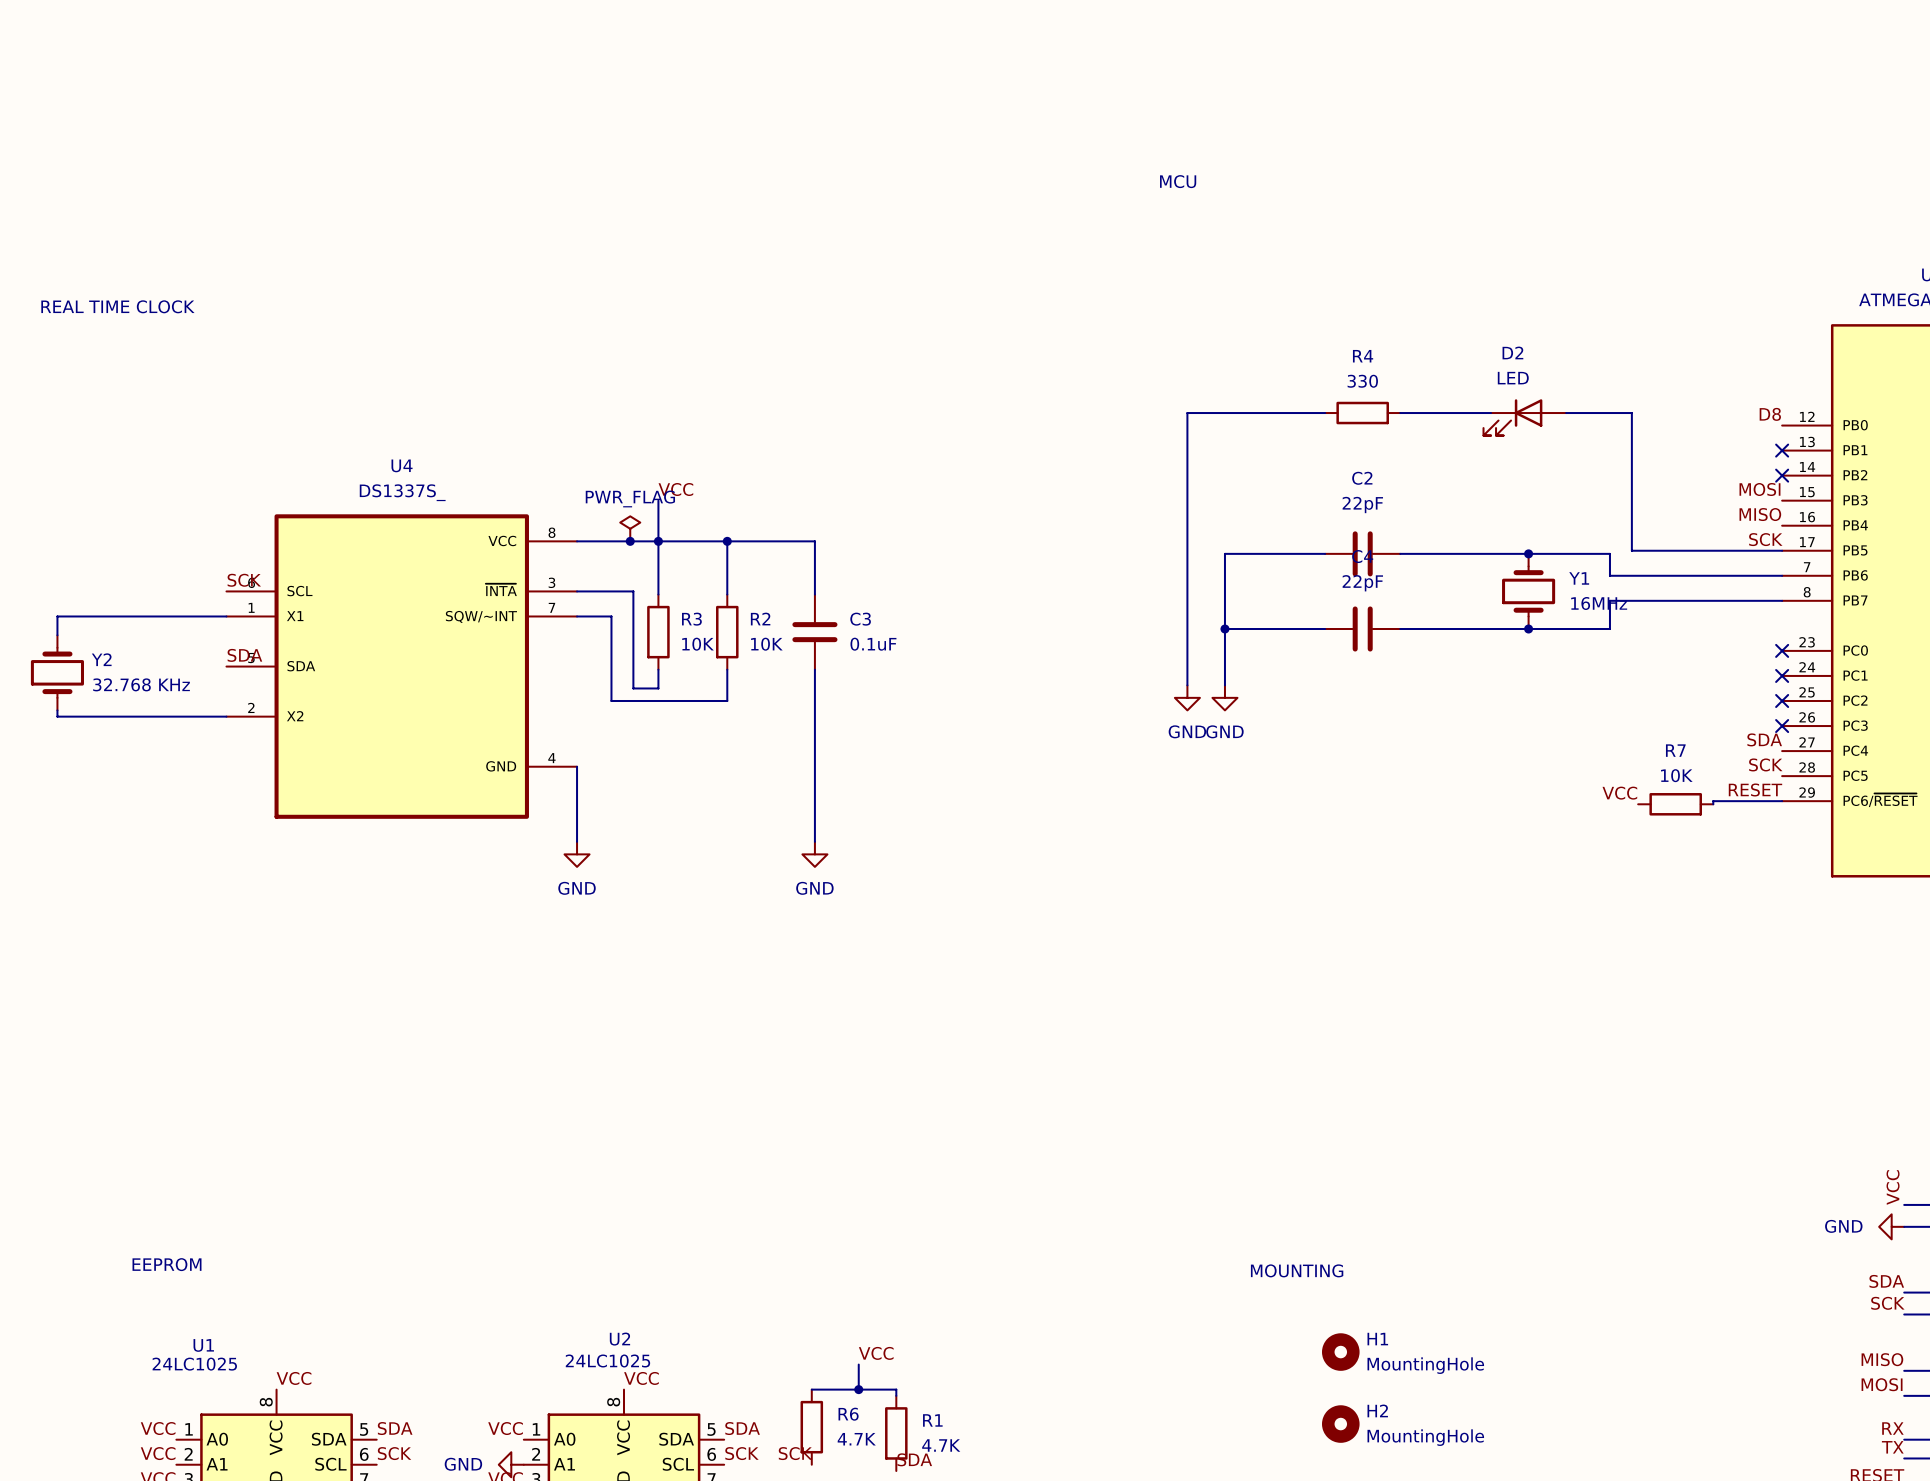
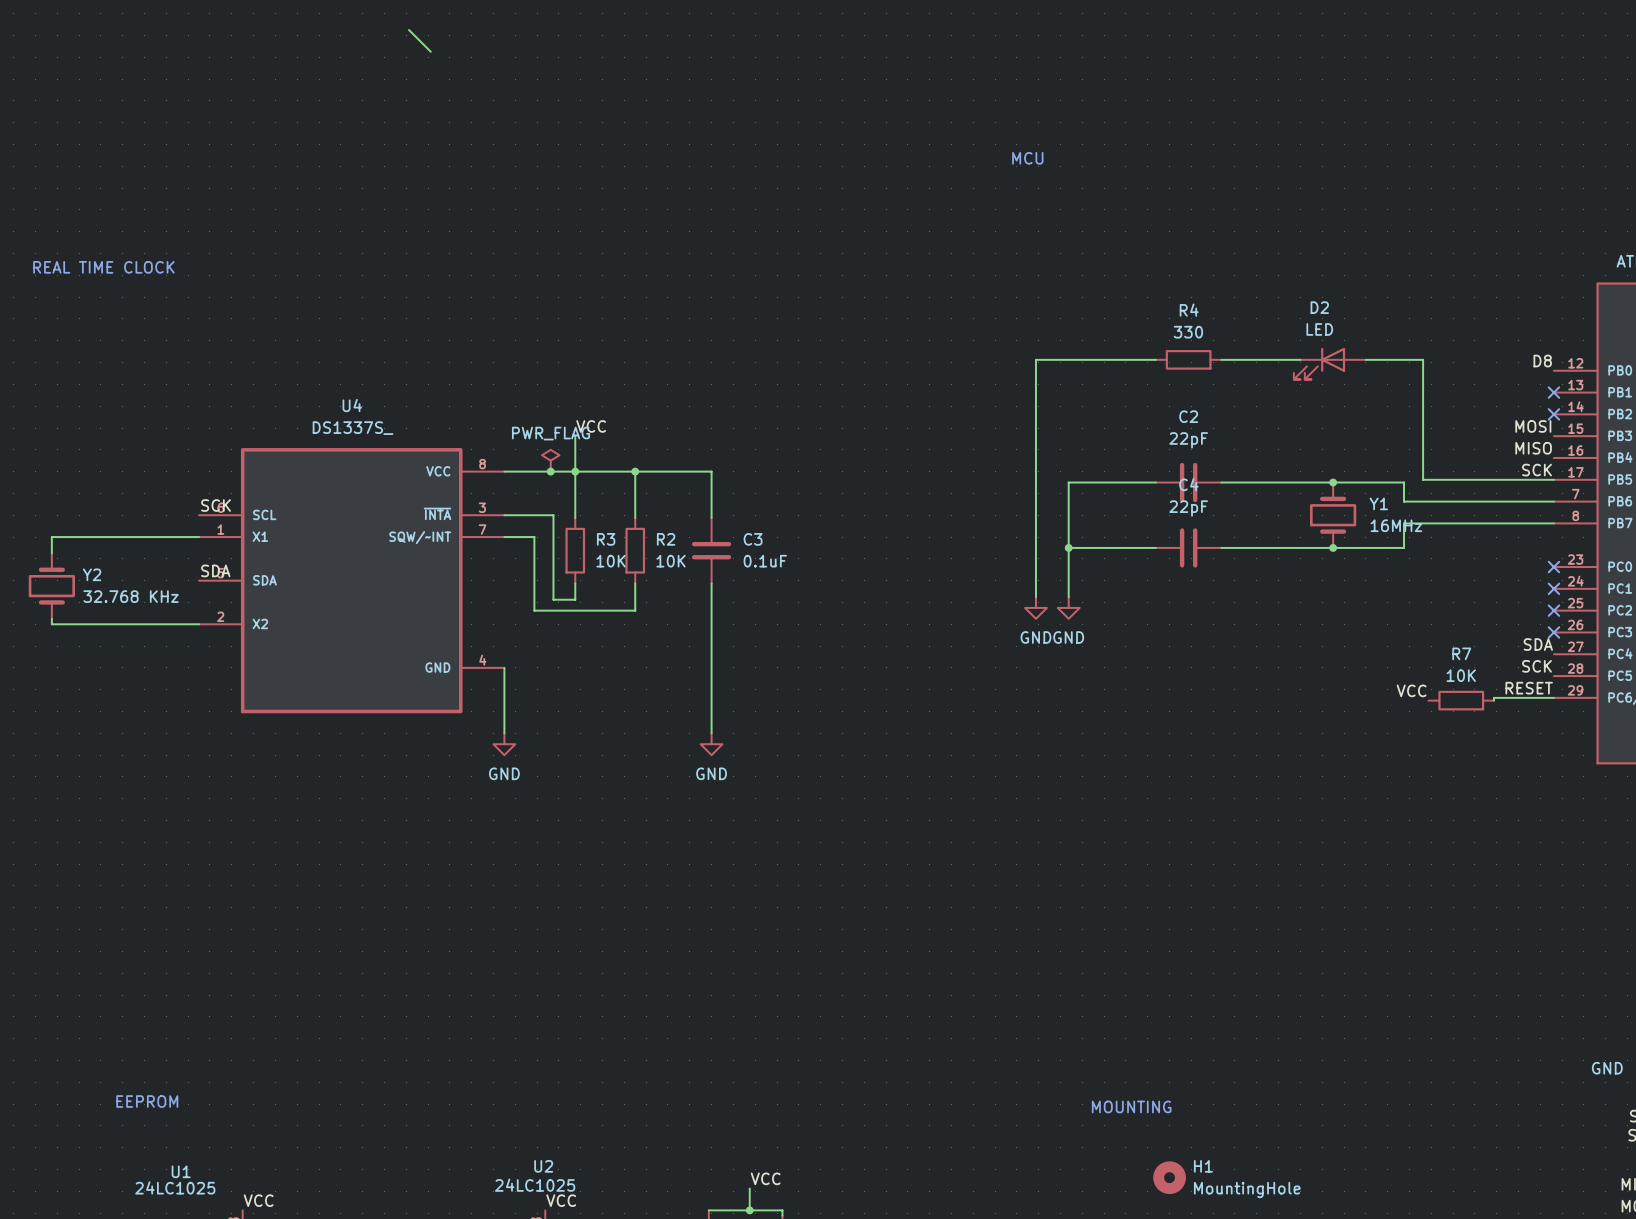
wire: none -> (408, 29) (430, 51)

